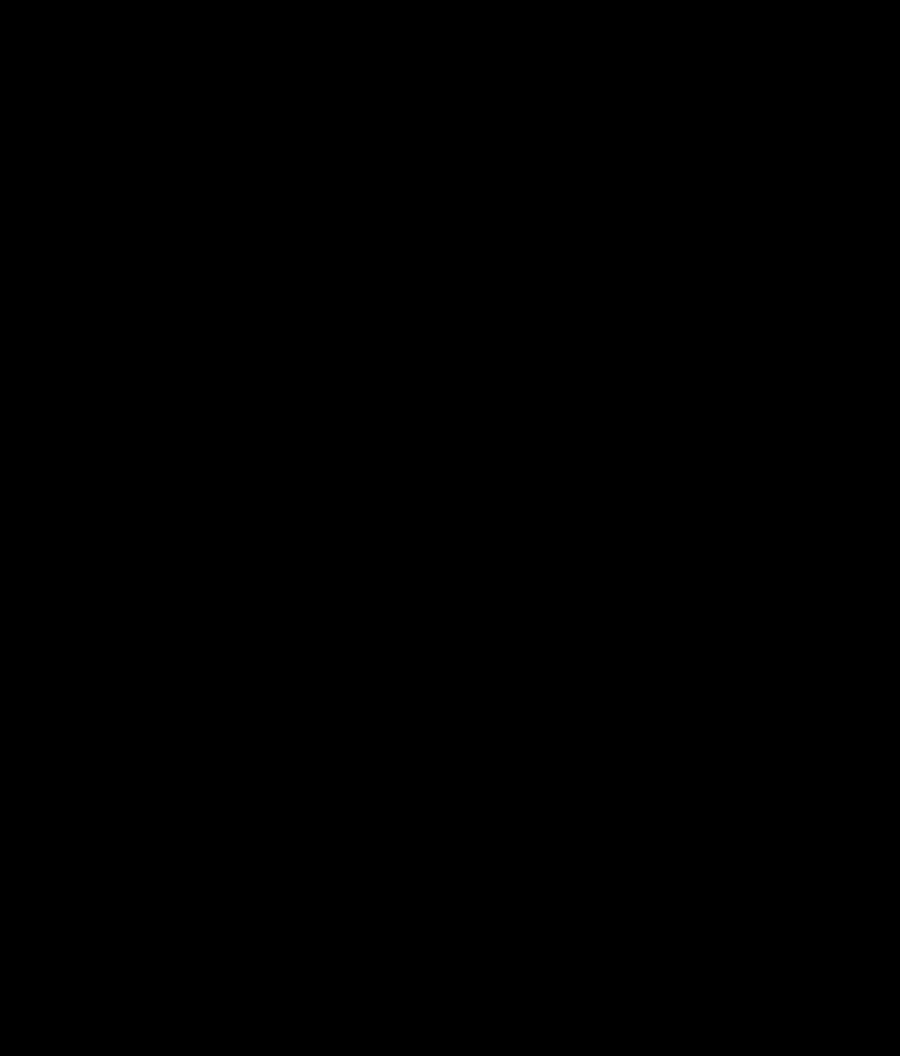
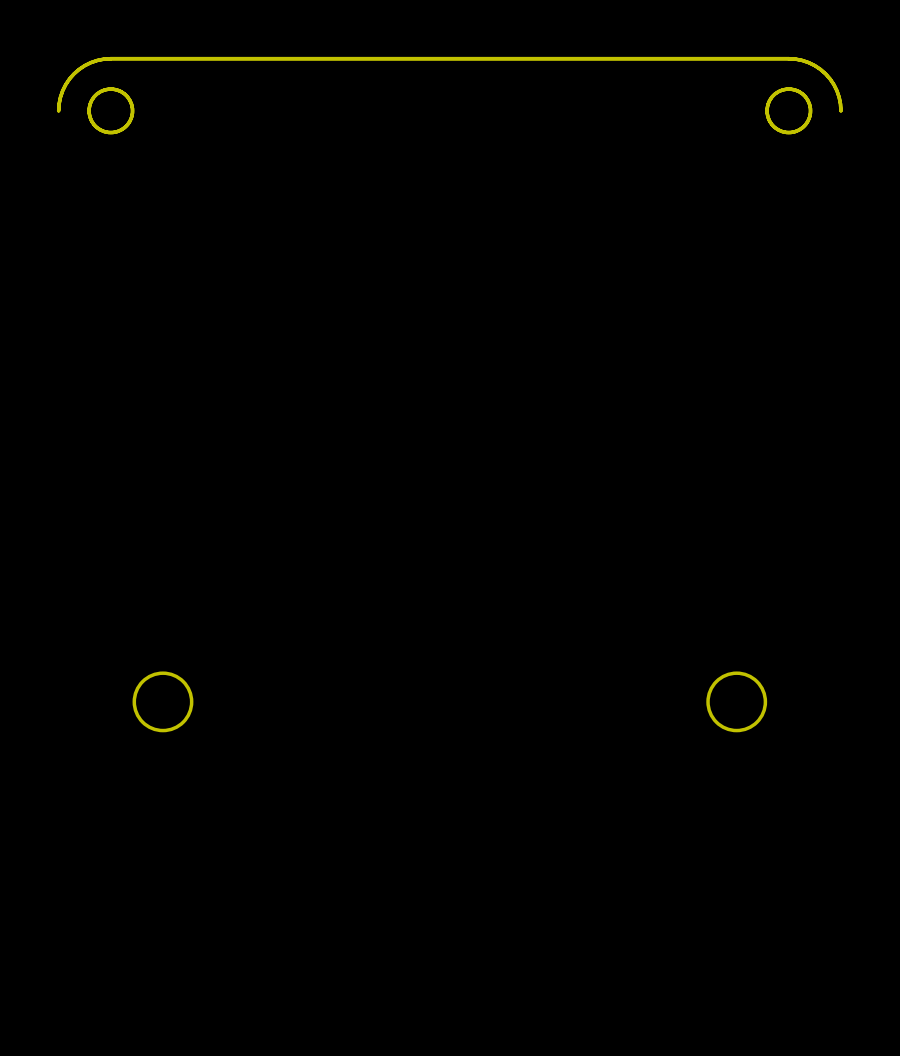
board edge: none -> (110, 58) (90, 62) (73, 73) (62, 90) (58, 110) (60, 97) (62, 90) (65, 84) (73, 73) (84, 65) (90, 62) (104, 59) (110, 58)
board edge: none -> (788, 58) (110, 58)
board edge: none -> (788, 58) (808, 62) (825, 73) (836, 90) (840, 110) (839, 97) (836, 90) (830, 79) (825, 73) (820, 69) (808, 62) (802, 60) (788, 58)
round board edge: none -> [87, 87, 135, 135]
round board edge: none -> [765, 87, 813, 135]
round board edge: none -> [132, 671, 194, 733]
round board edge: none -> [706, 671, 768, 733]

